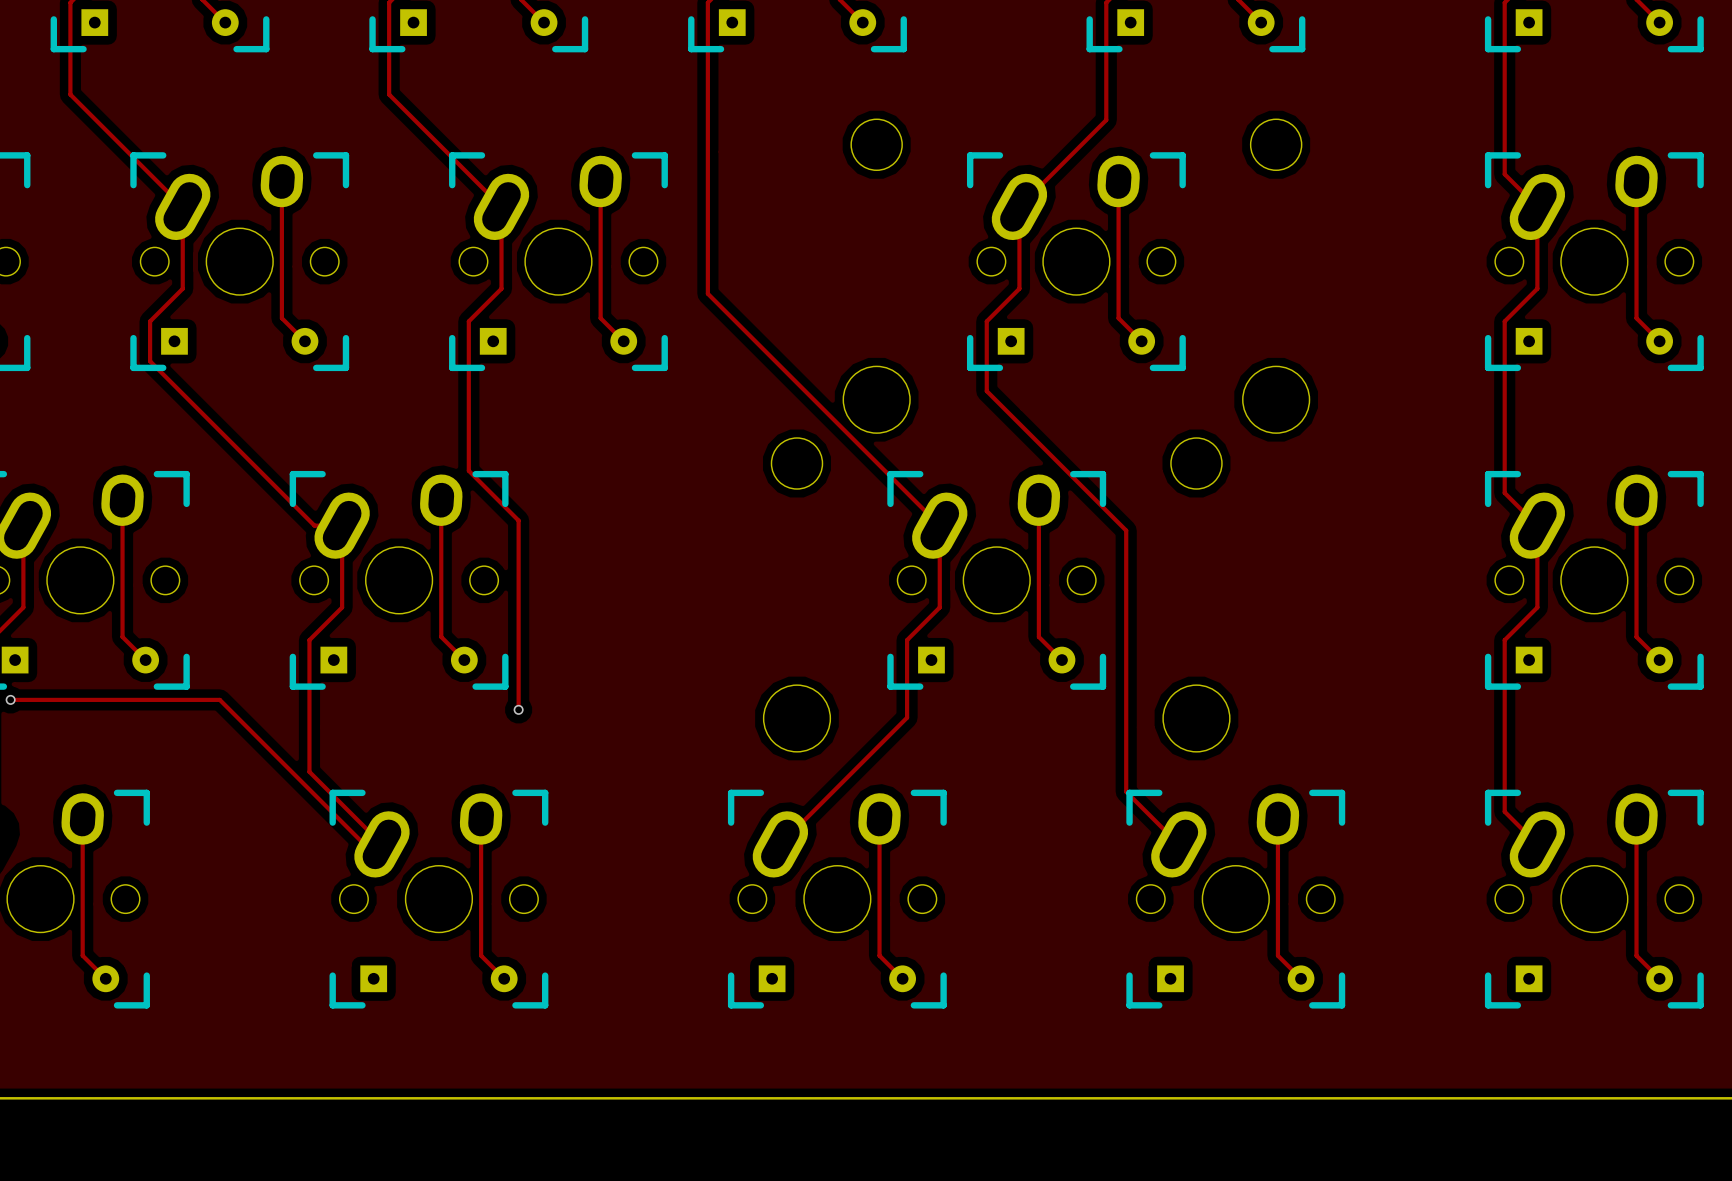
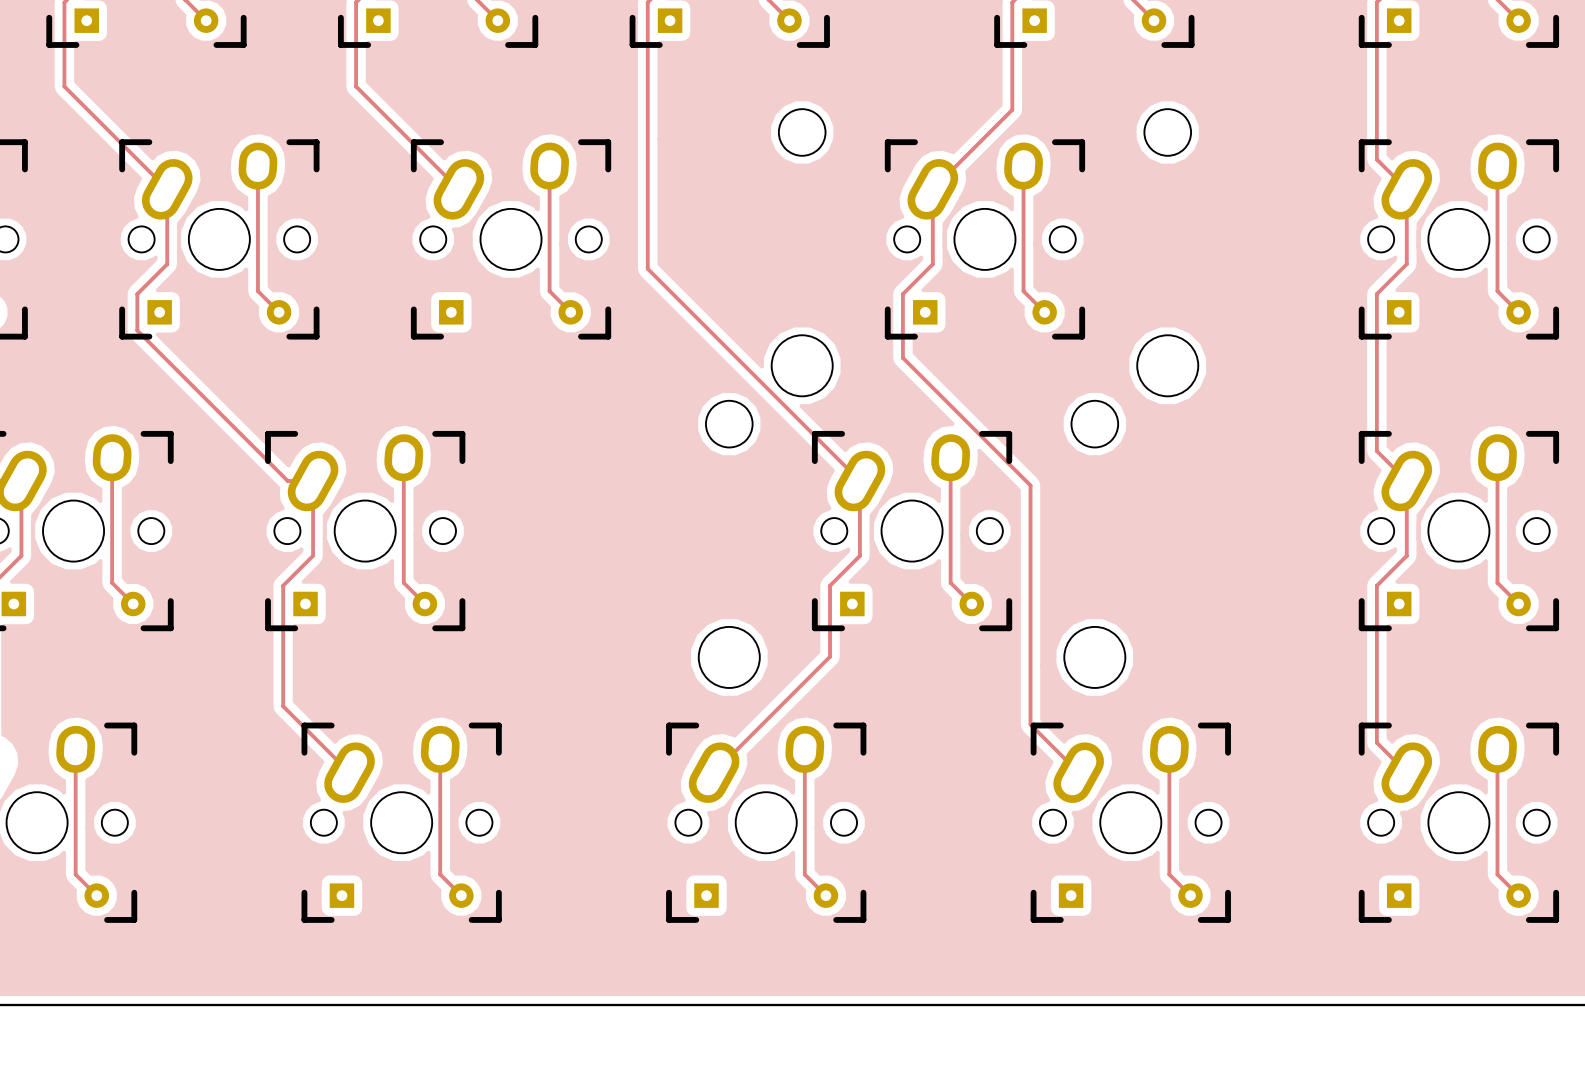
track: (501, 206) (501, 288) (468, 321) (468, 470) (518, 520) (518, 709) -> none
track: (10, 699) (219, 699) (364, 844) (381, 844) -> none
via: (10, 699) -> none
via: (518, 709) -> none

